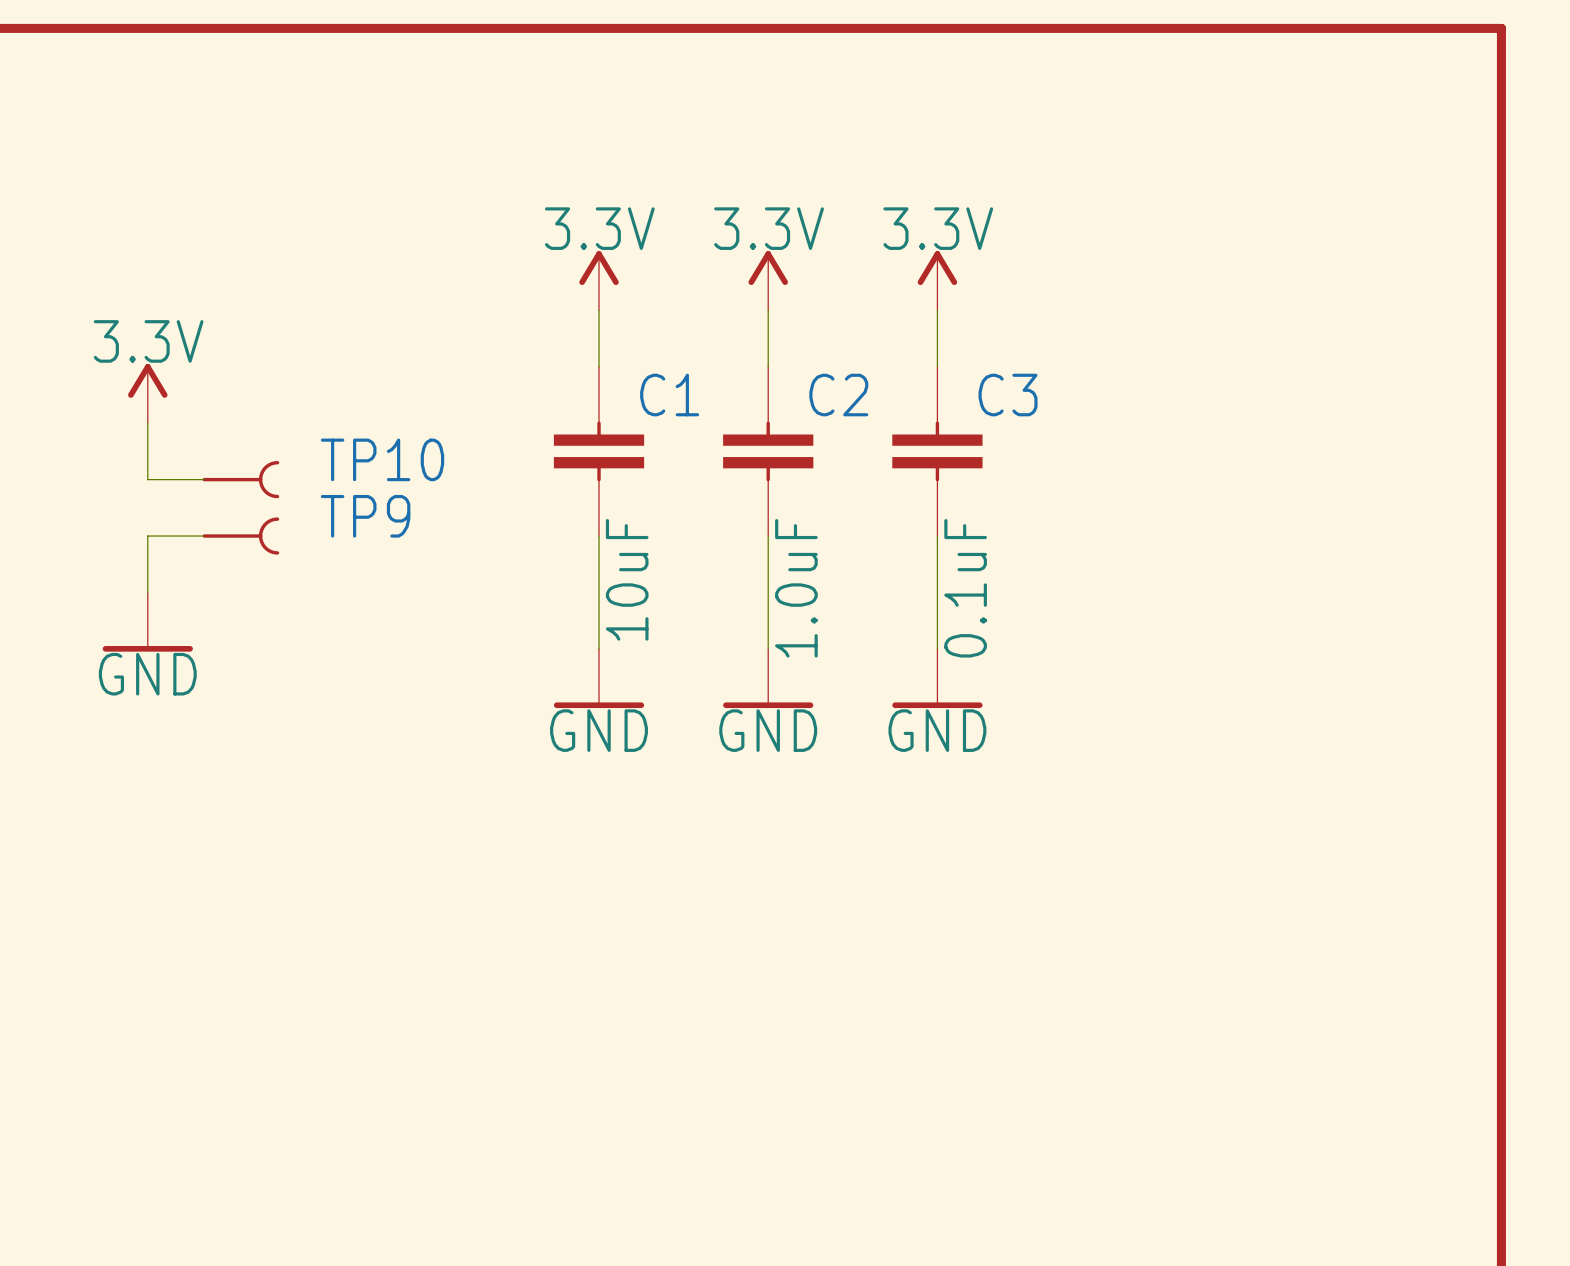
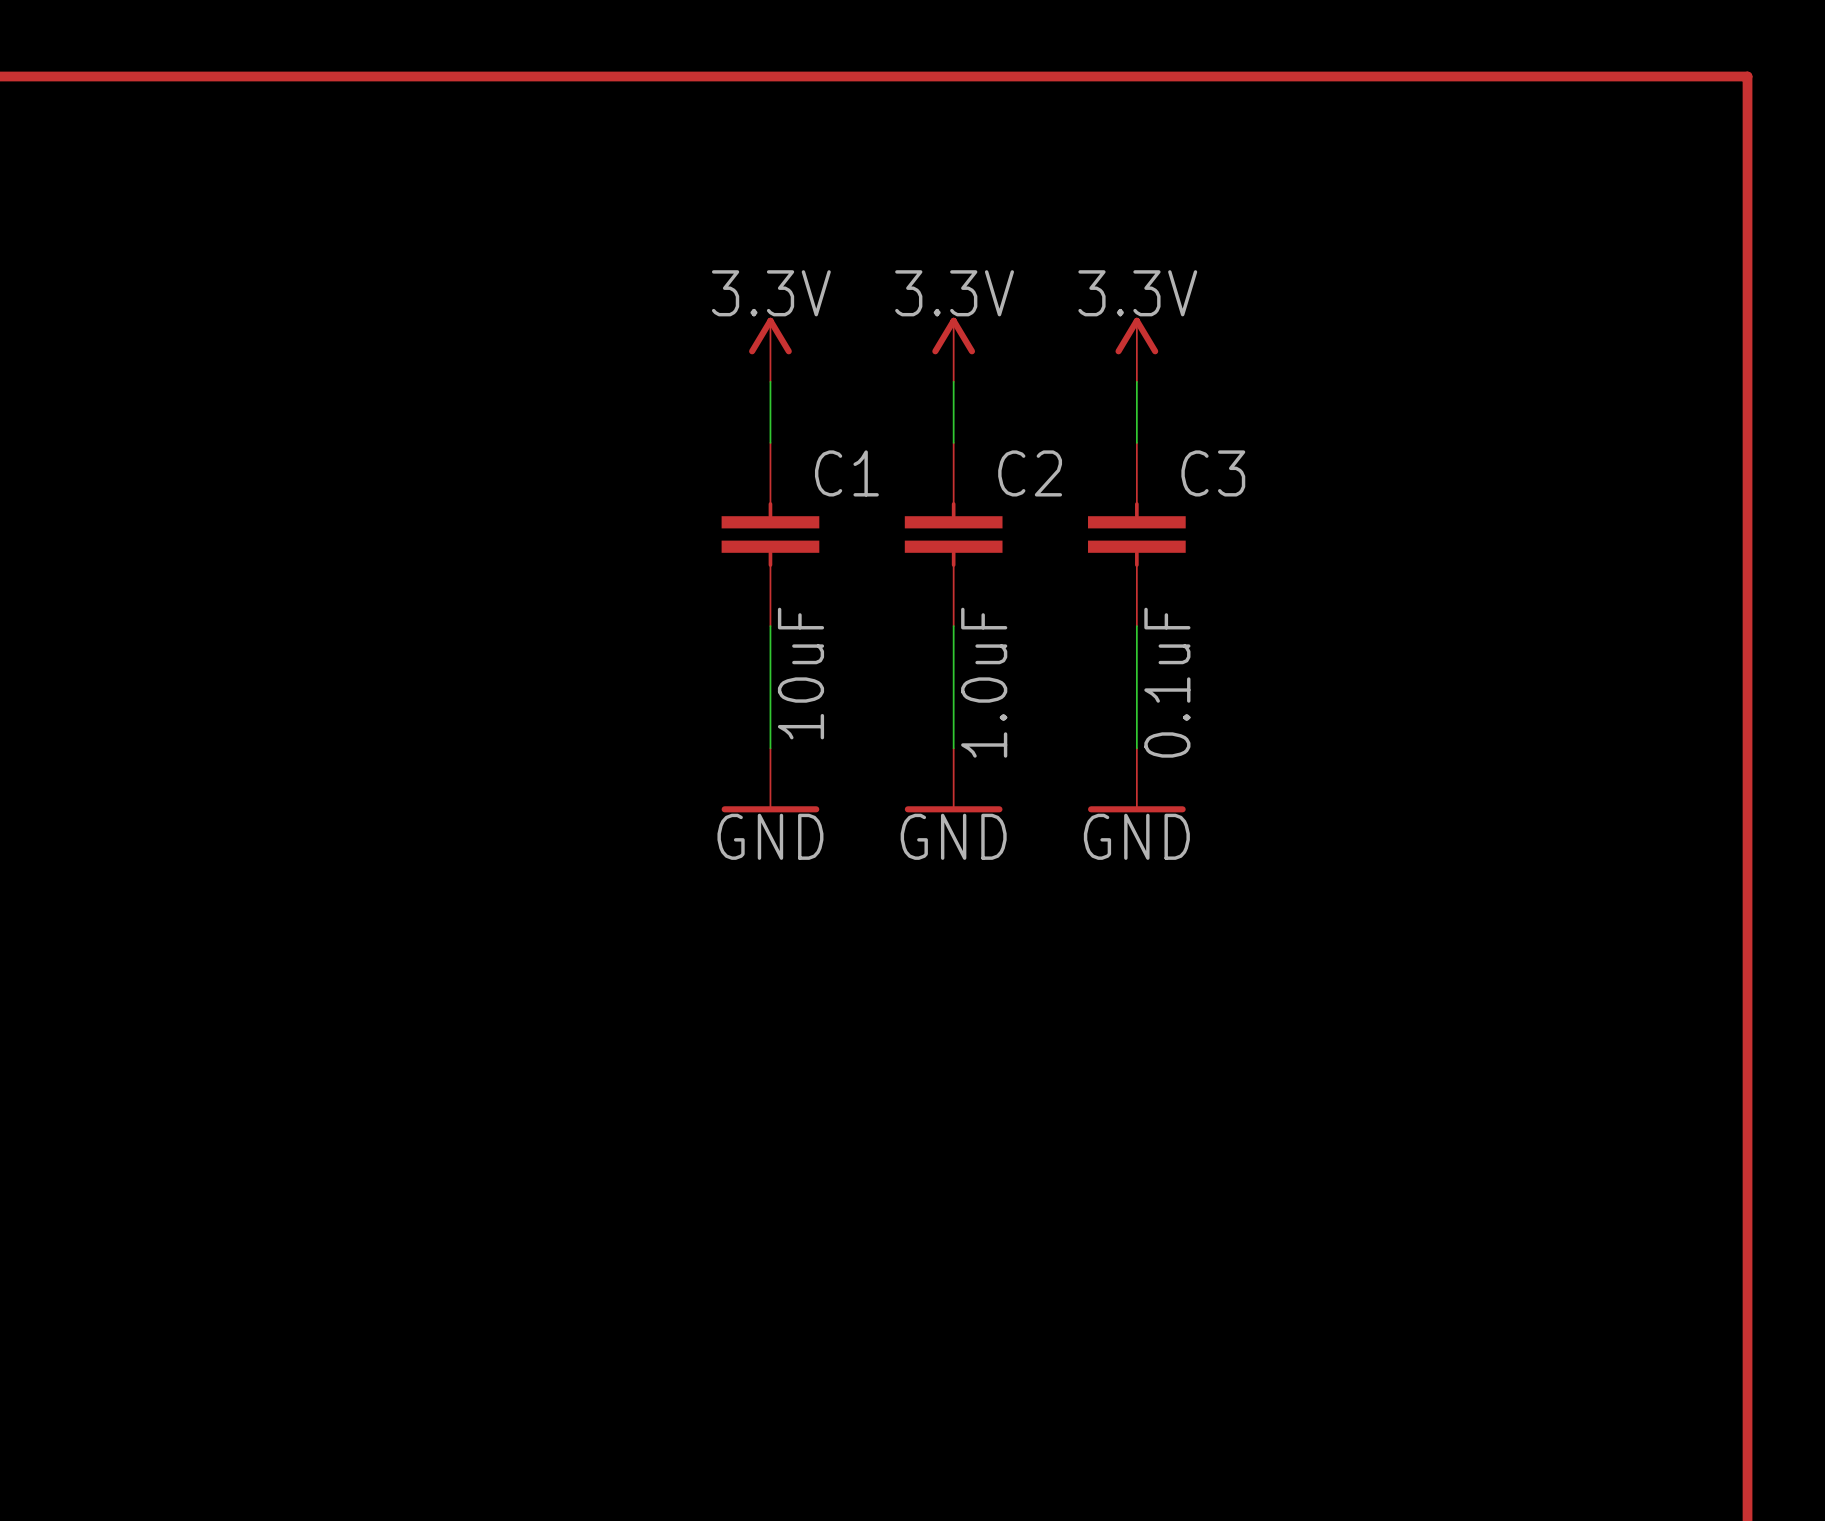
power symbol: 3.3V (147, 393) -> none
wire: (147, 423) (147, 479) (204, 479) -> none
TP10: (240, 479) -> none
wire: (204, 536) (147, 536) (147, 592) -> none
TP9: (240, 536) -> none
power symbol: GND (147, 622) -> none

